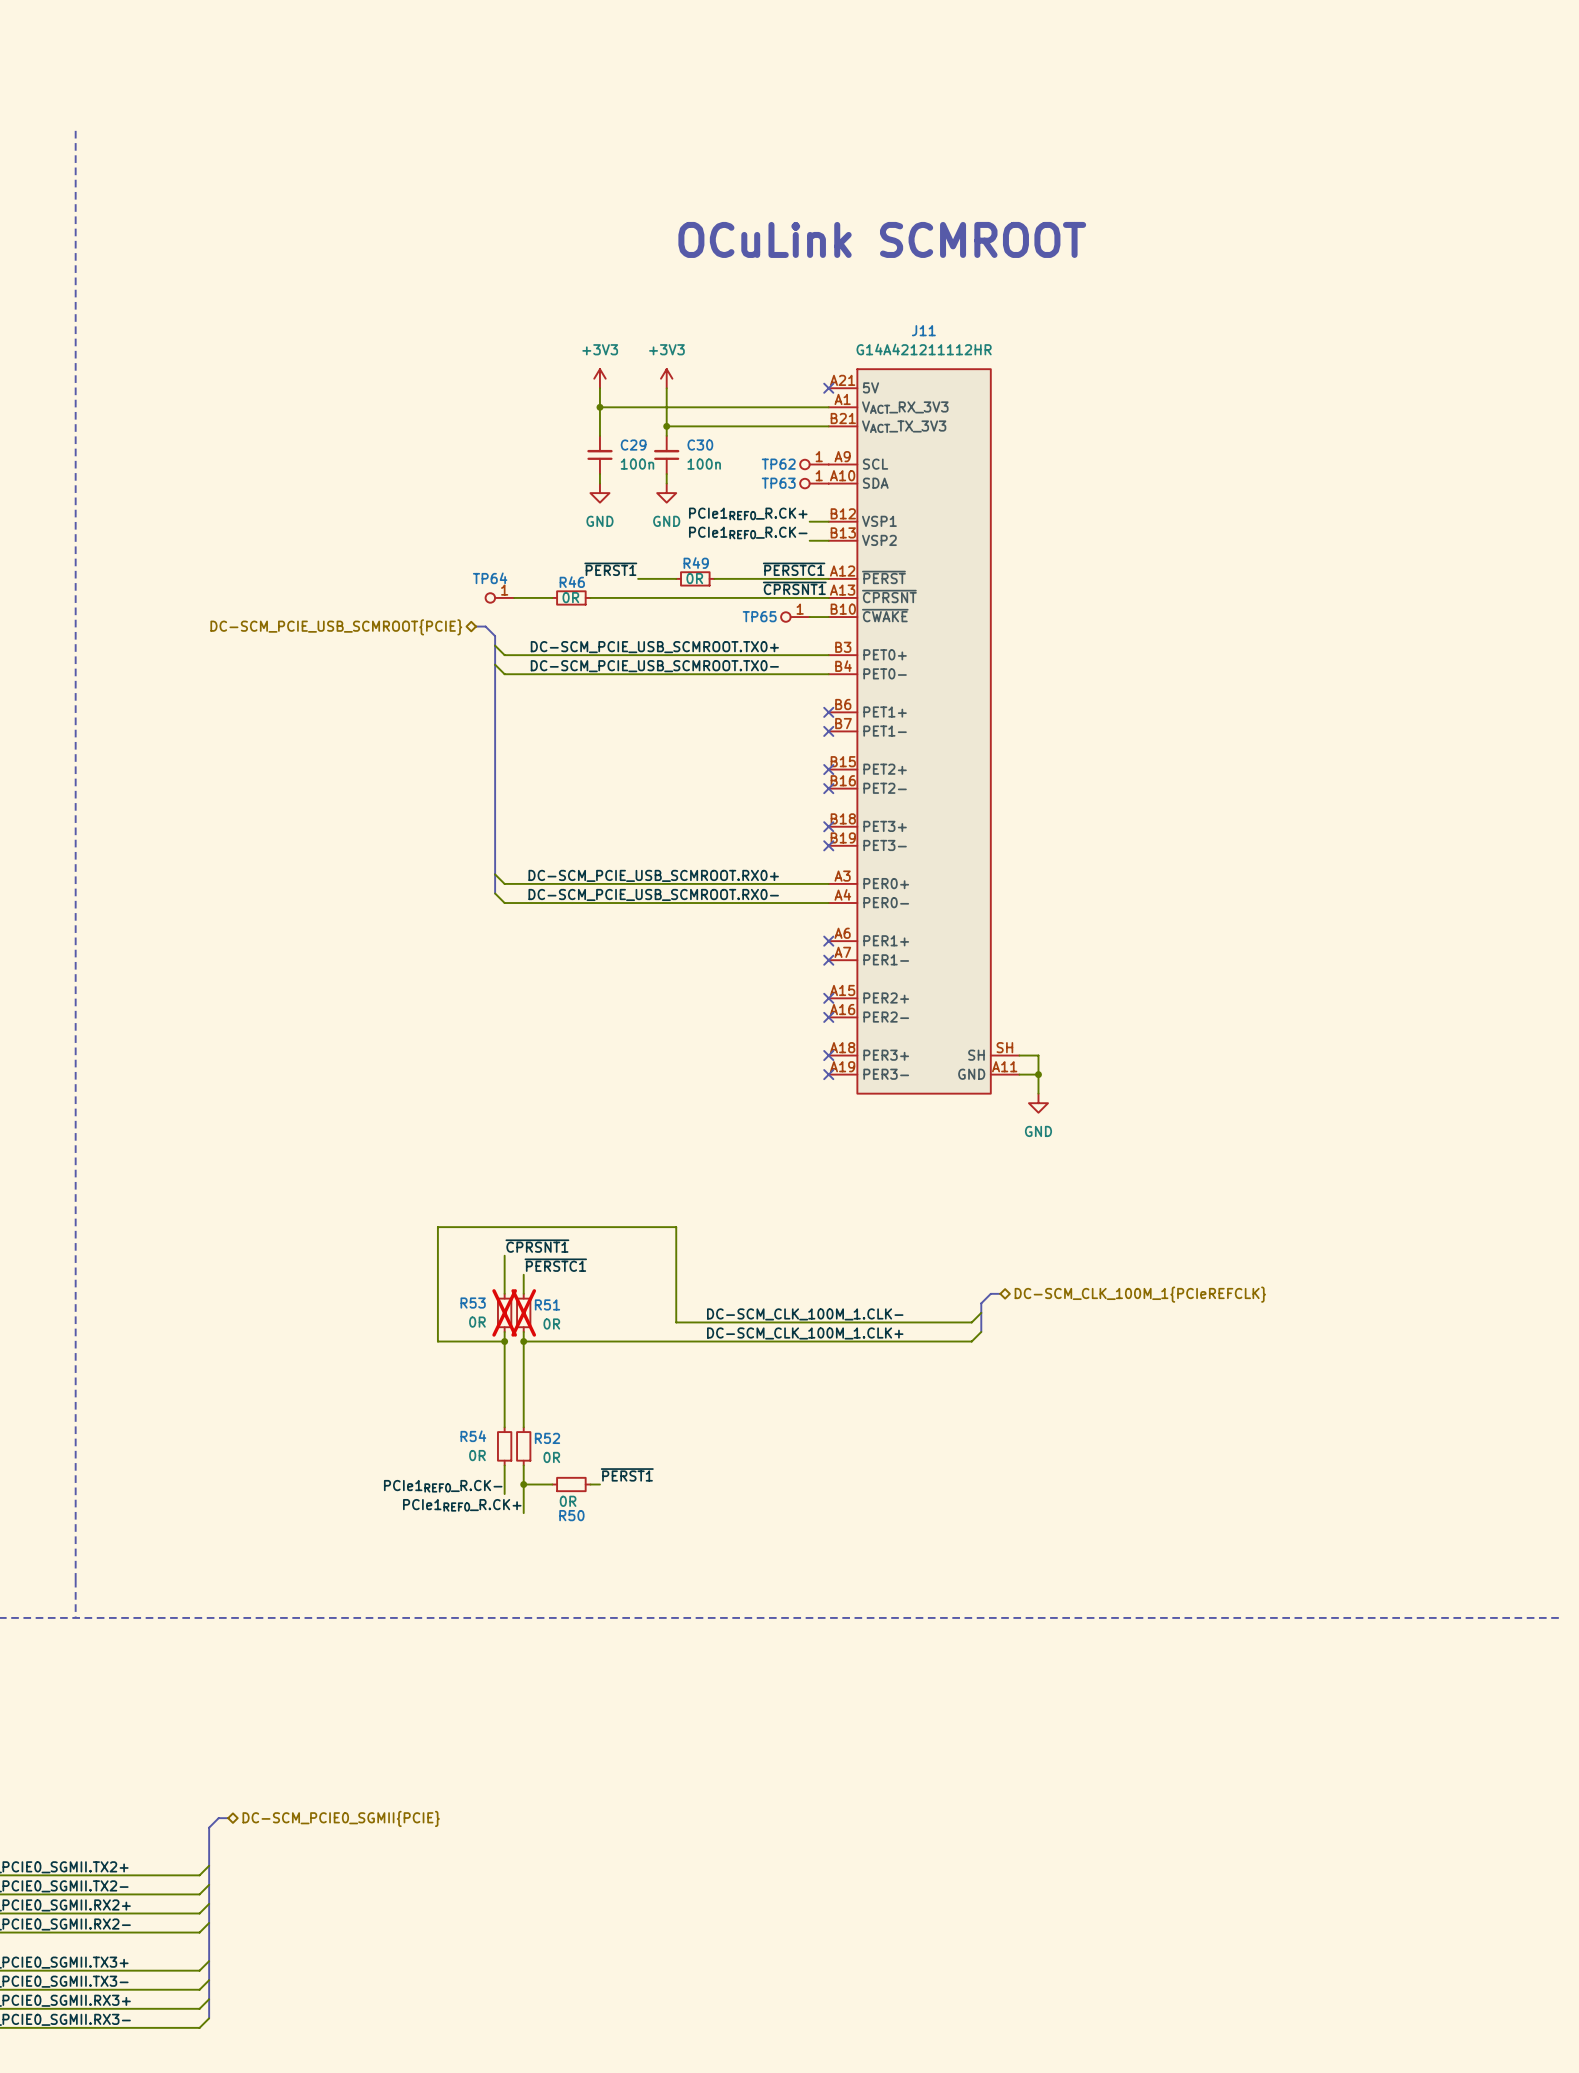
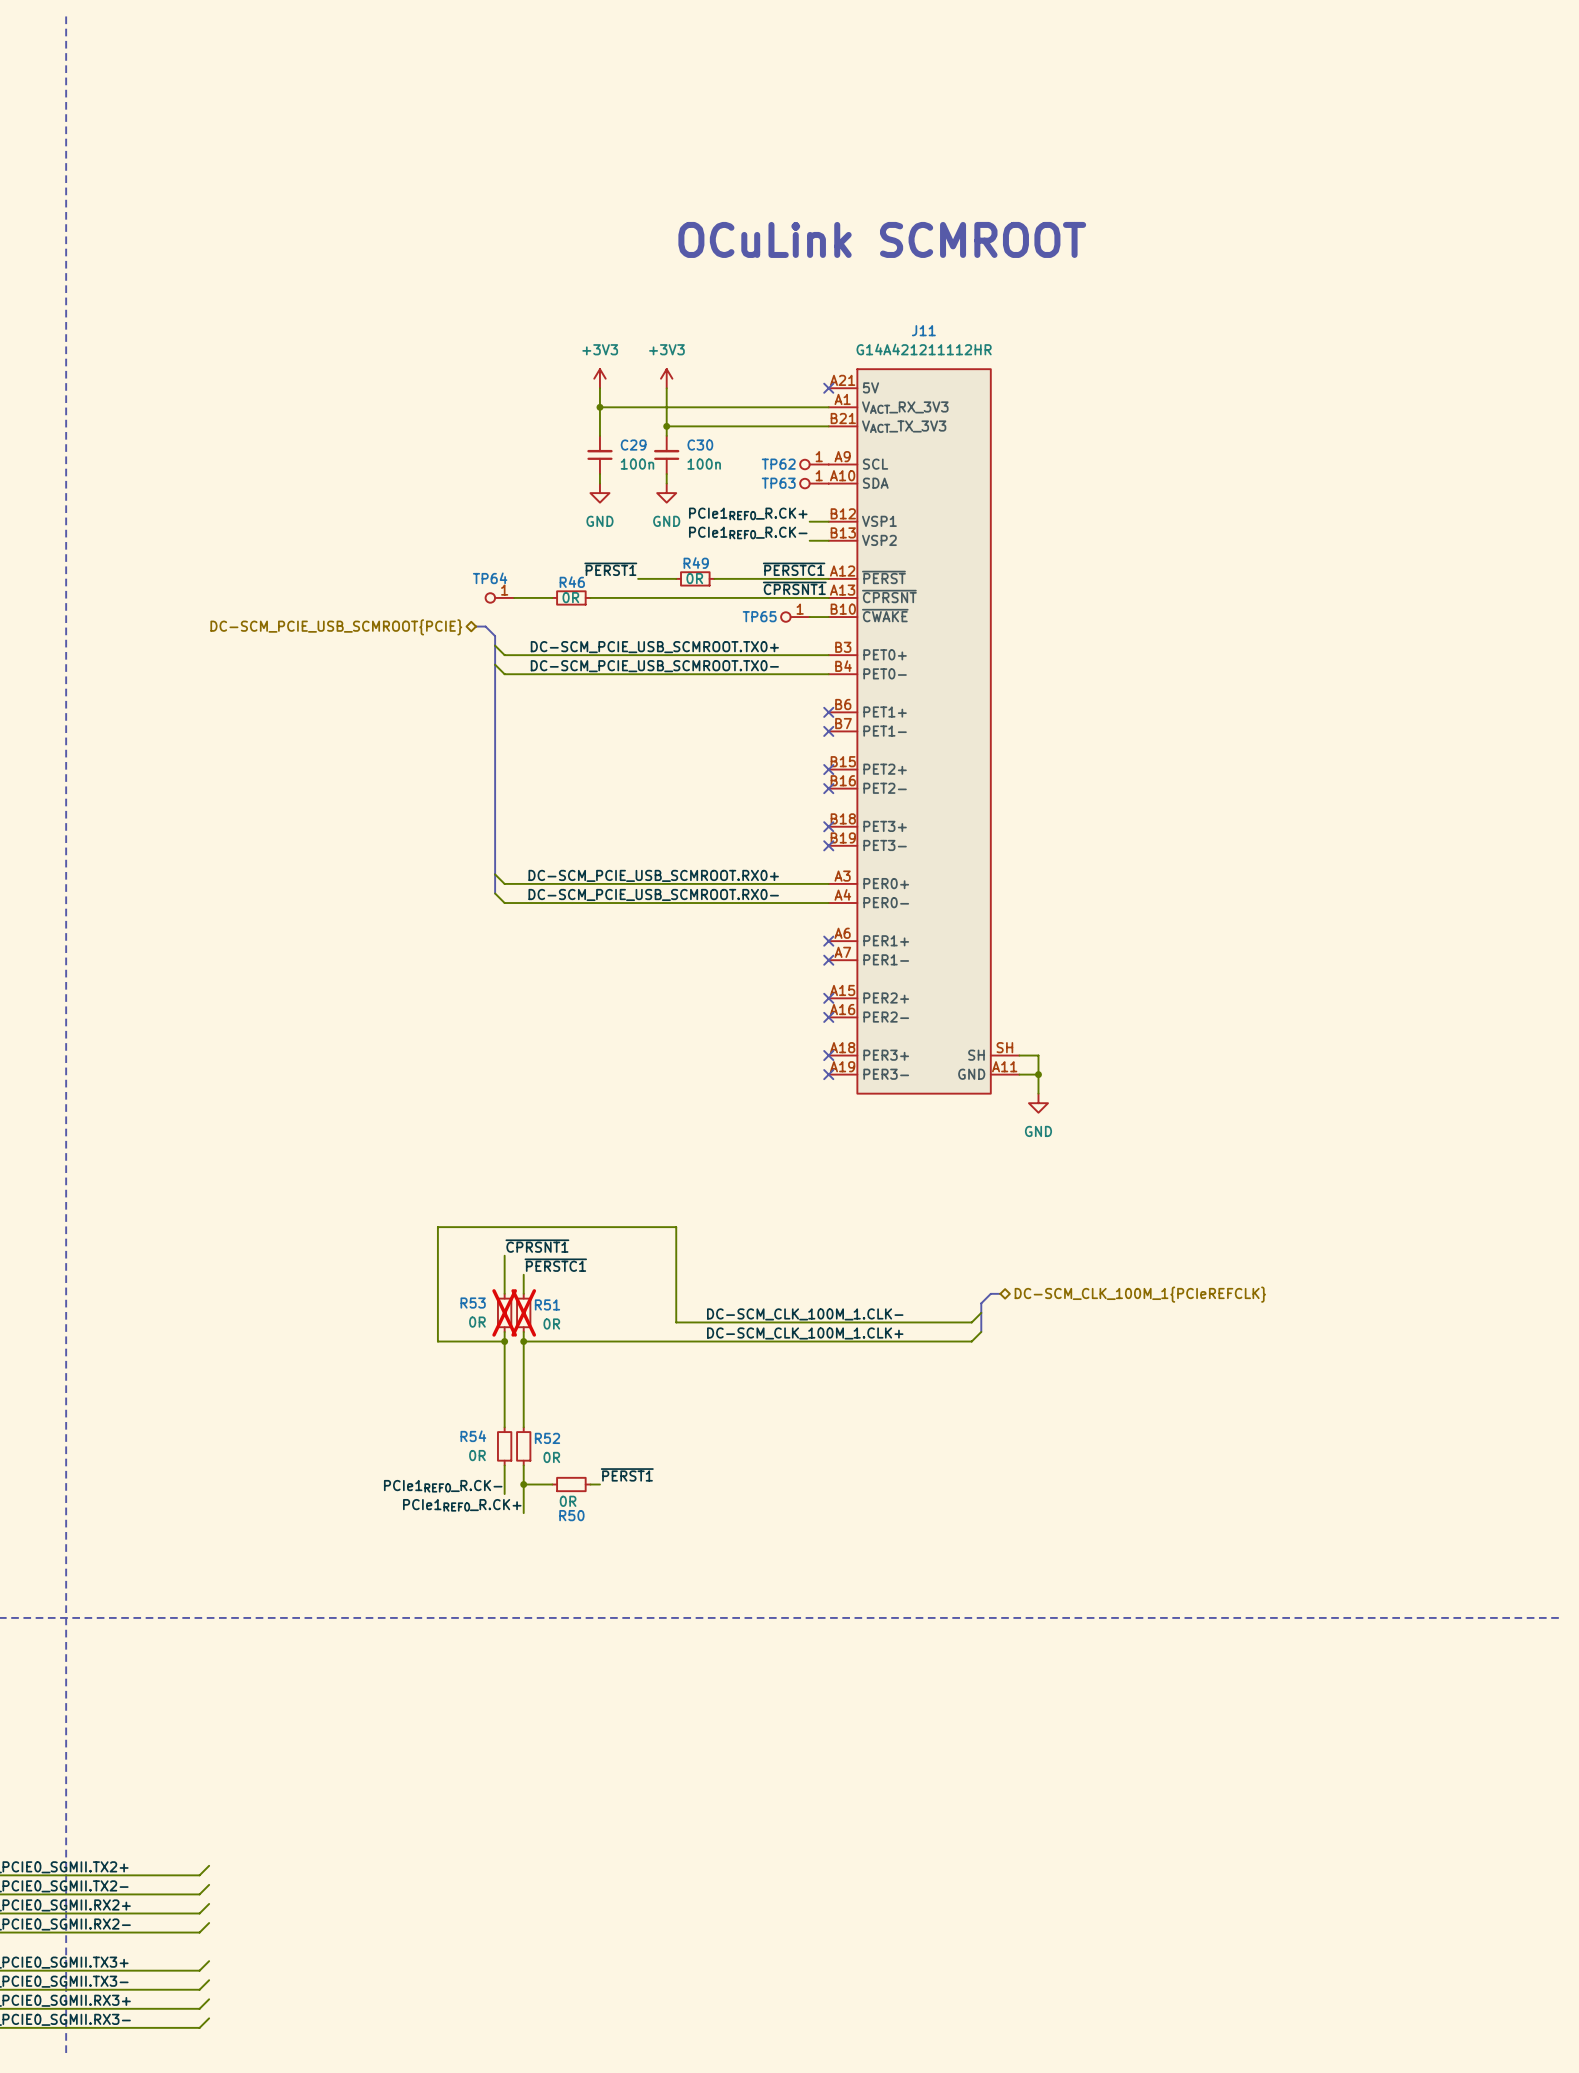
line: none -> (66, 16) (66, 2056)
line: (75, 130) (75, 1617) -> none
bus: (228, 1818) (218, 1818) (209, 1827) (209, 2018) -> none
hierarchical label: DC-SCM_PCIE0_SGMII{PCIE} (341, 1818) -> none

